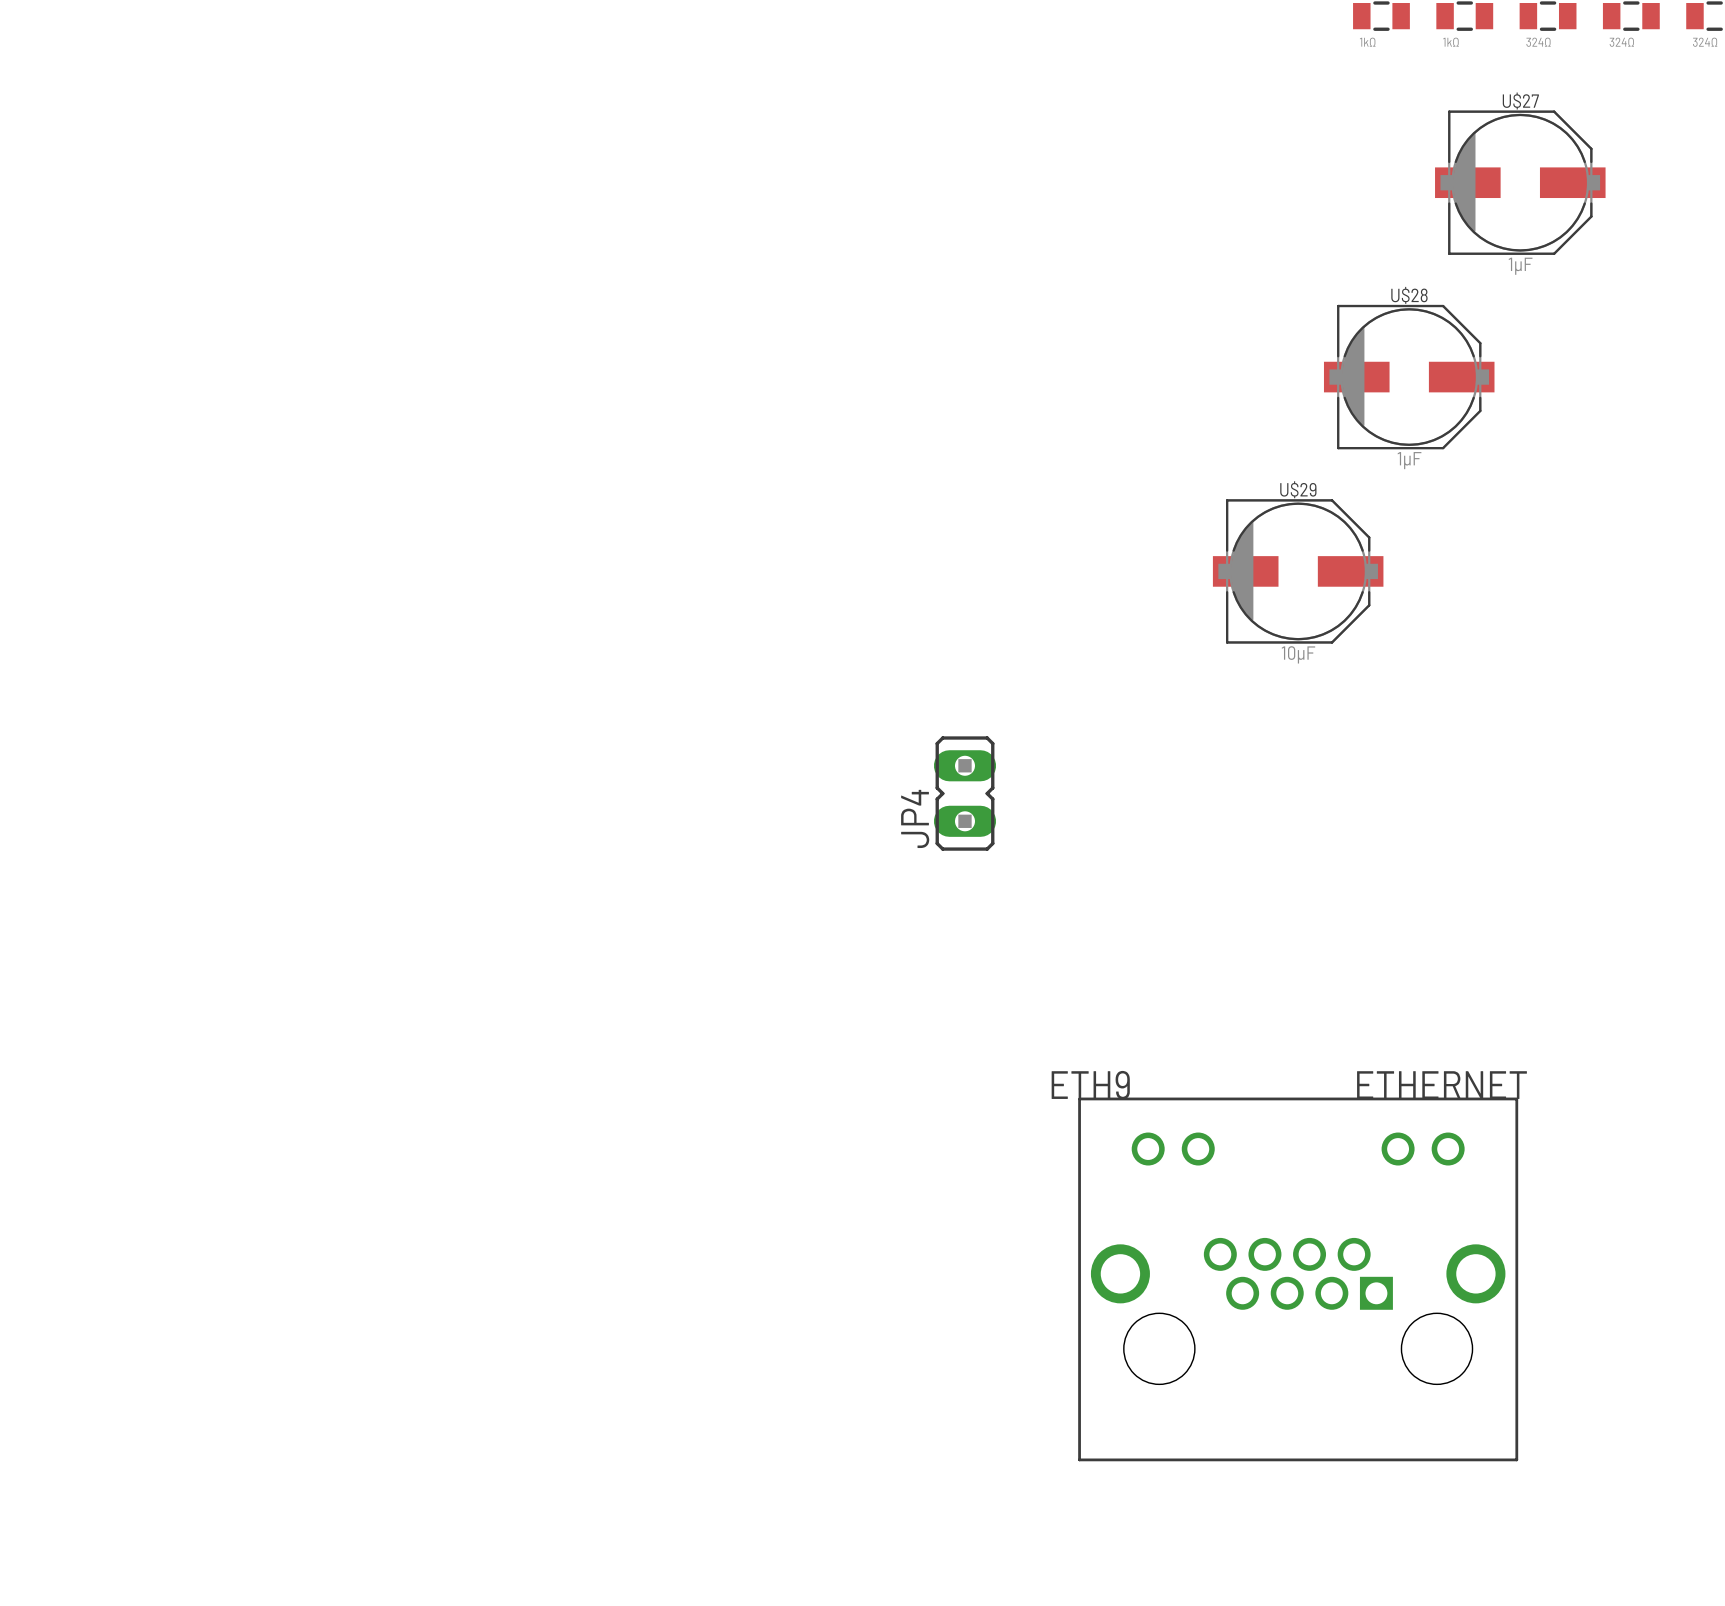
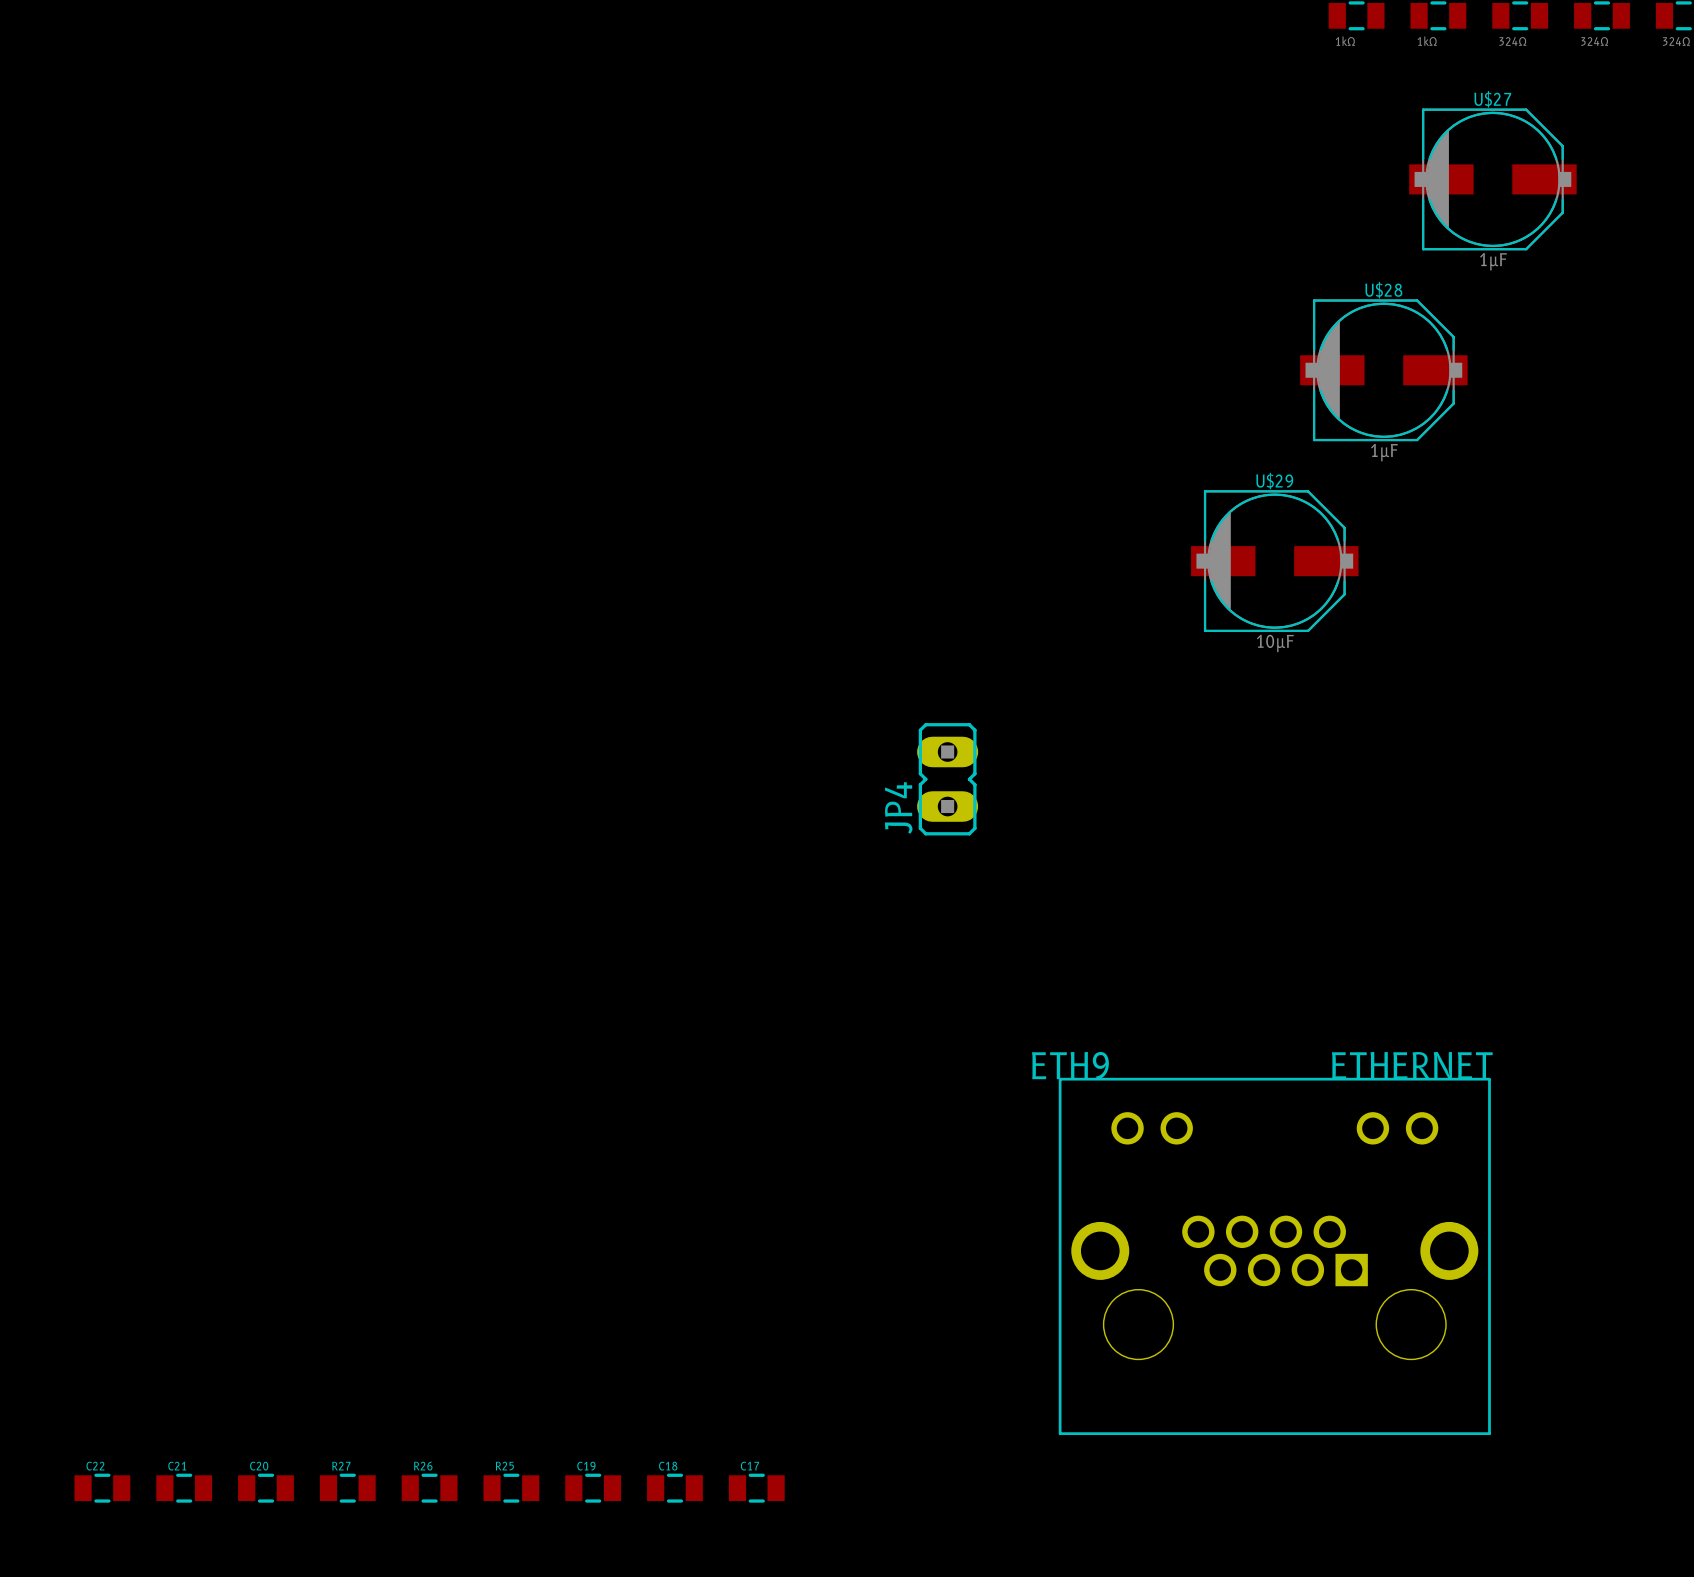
C22: none -> (102, 1488)
C21: none -> (184, 1488)
C20: none -> (266, 1488)
R27: none -> (347, 1488)
R26: none -> (429, 1488)
R25: none -> (511, 1488)
C19: none -> (593, 1488)
C18: none -> (674, 1488)
C17: none -> (756, 1488)

